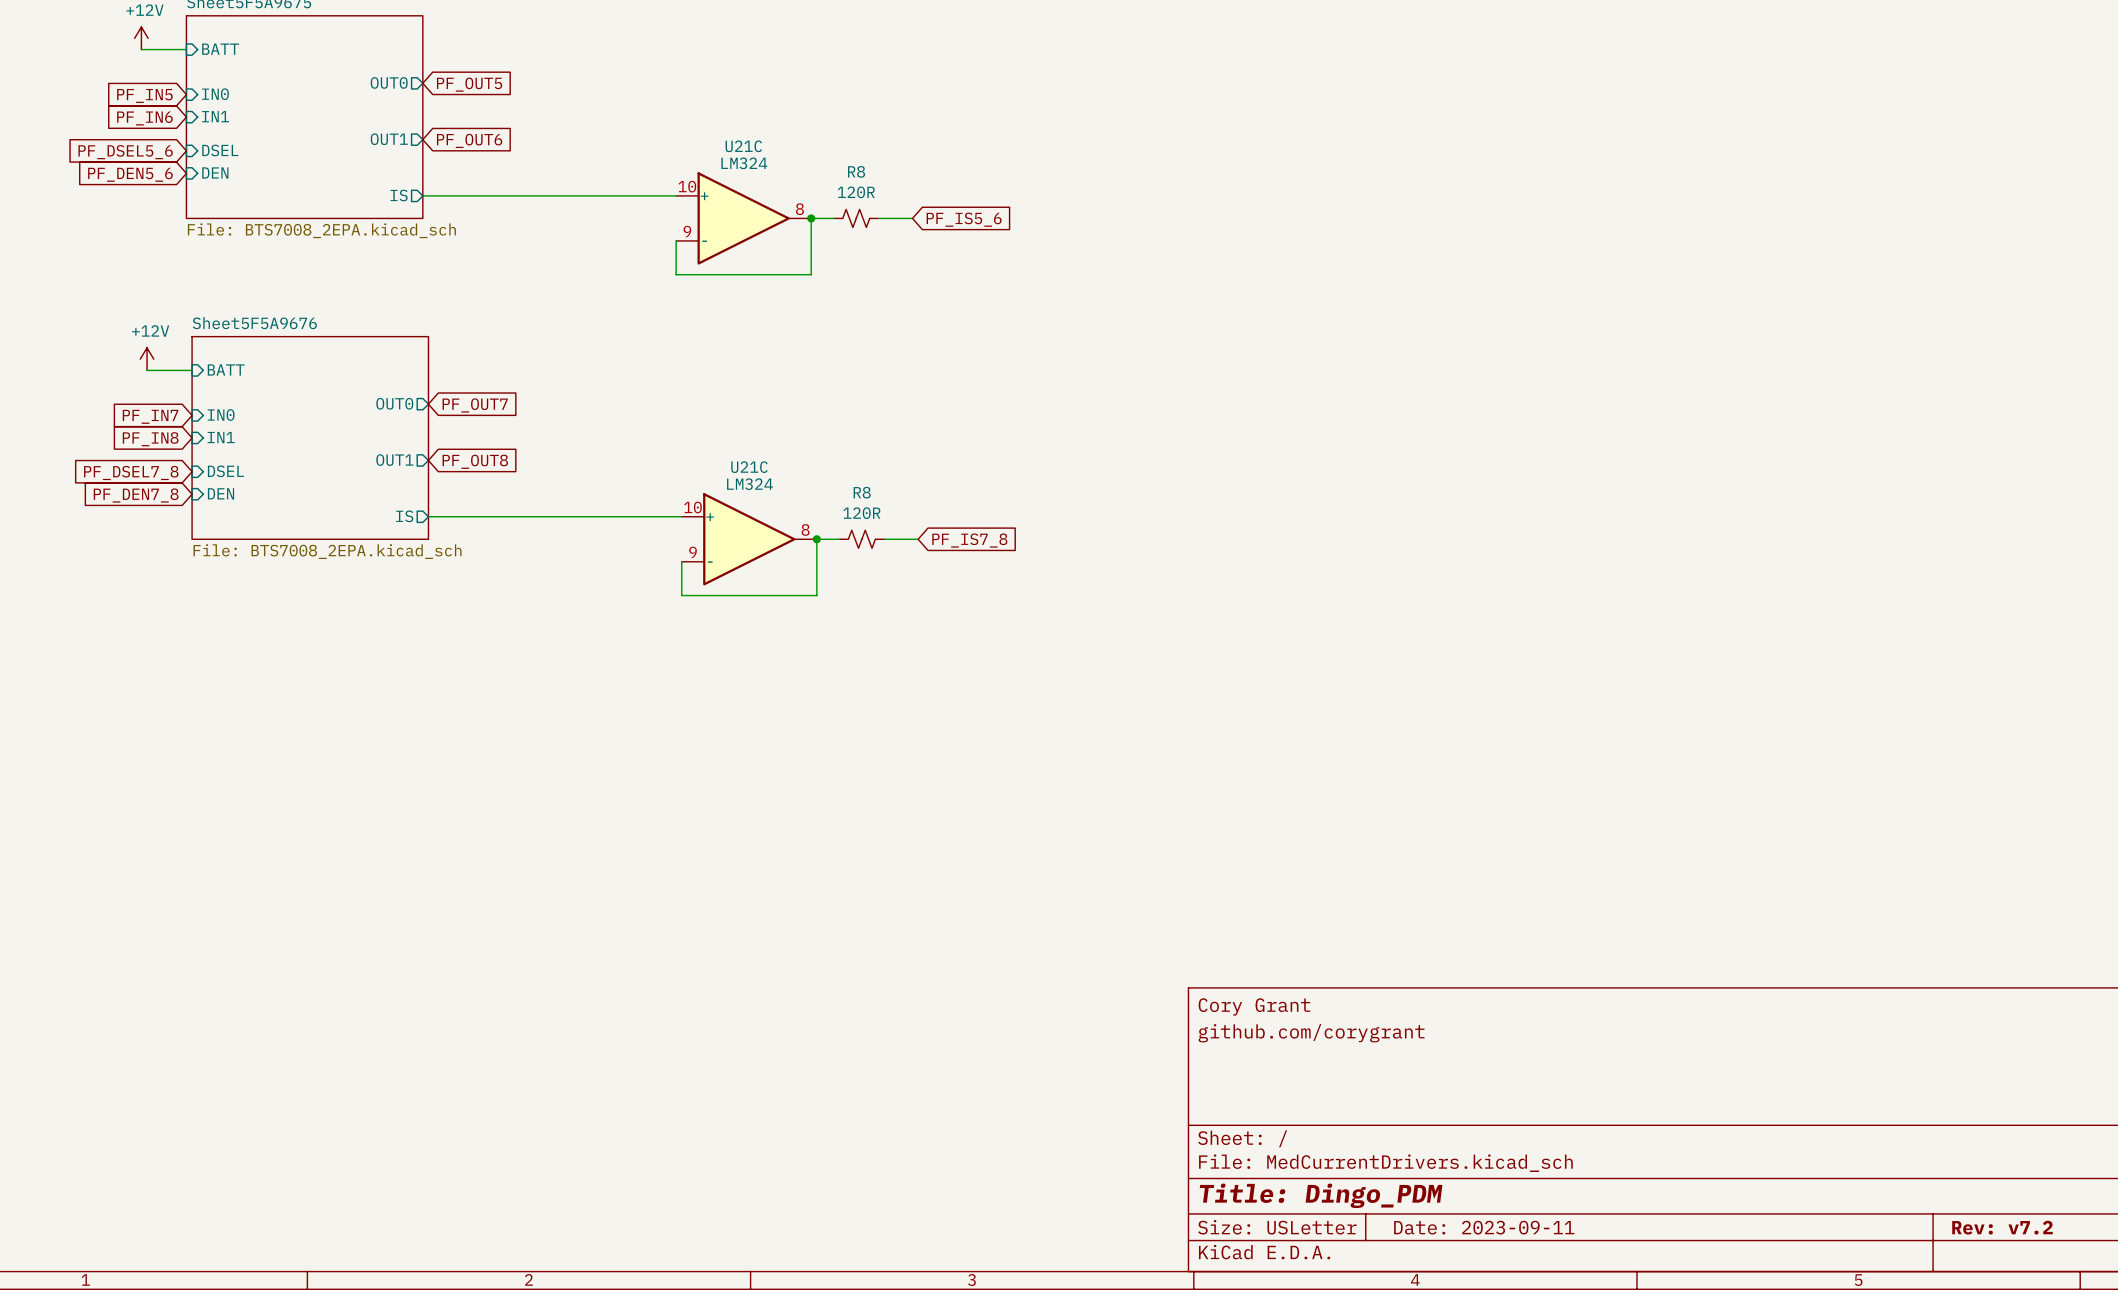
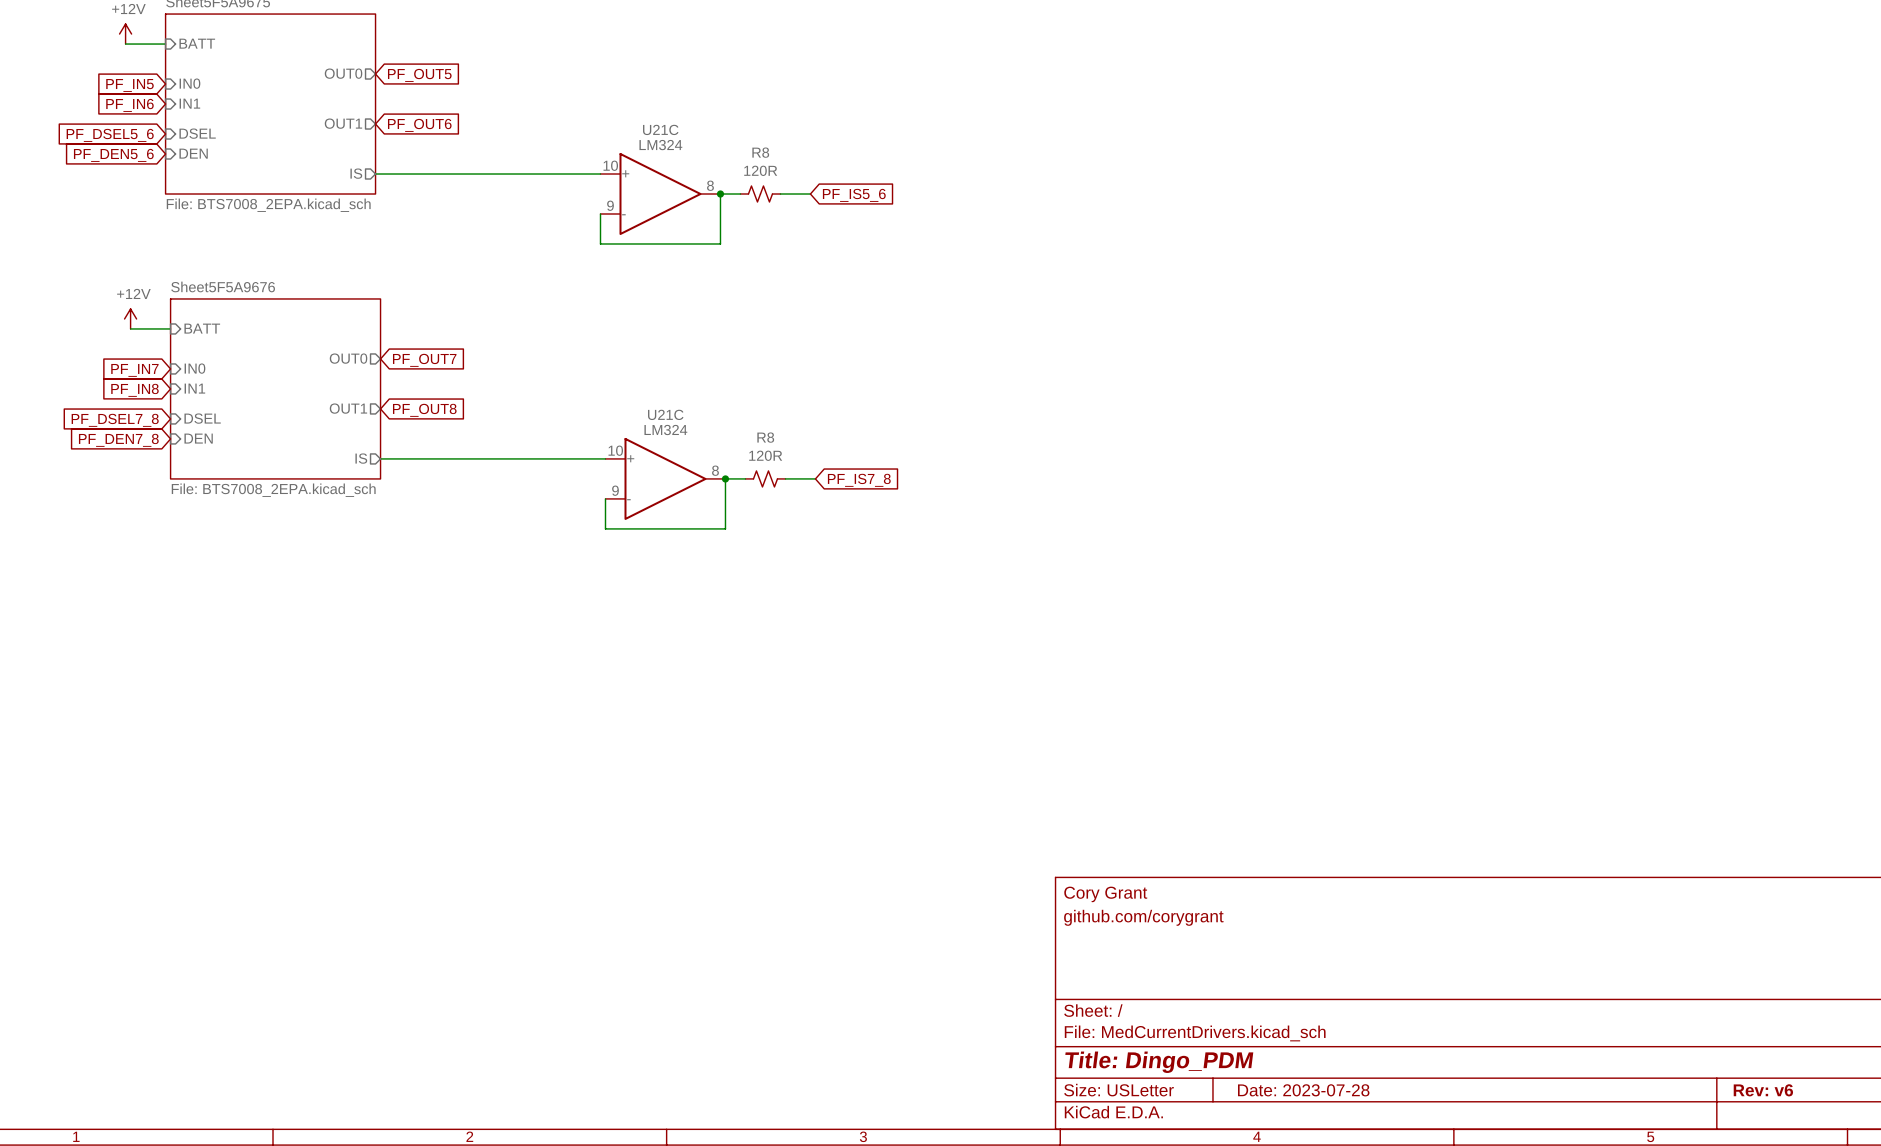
title block: Date: 2023-09-11 (1484, 1227) -> Date: 2023-07-28 (1303, 1090)
title block: Rev: v7.2 (2002, 1227) -> Rev: v6 (1763, 1090)

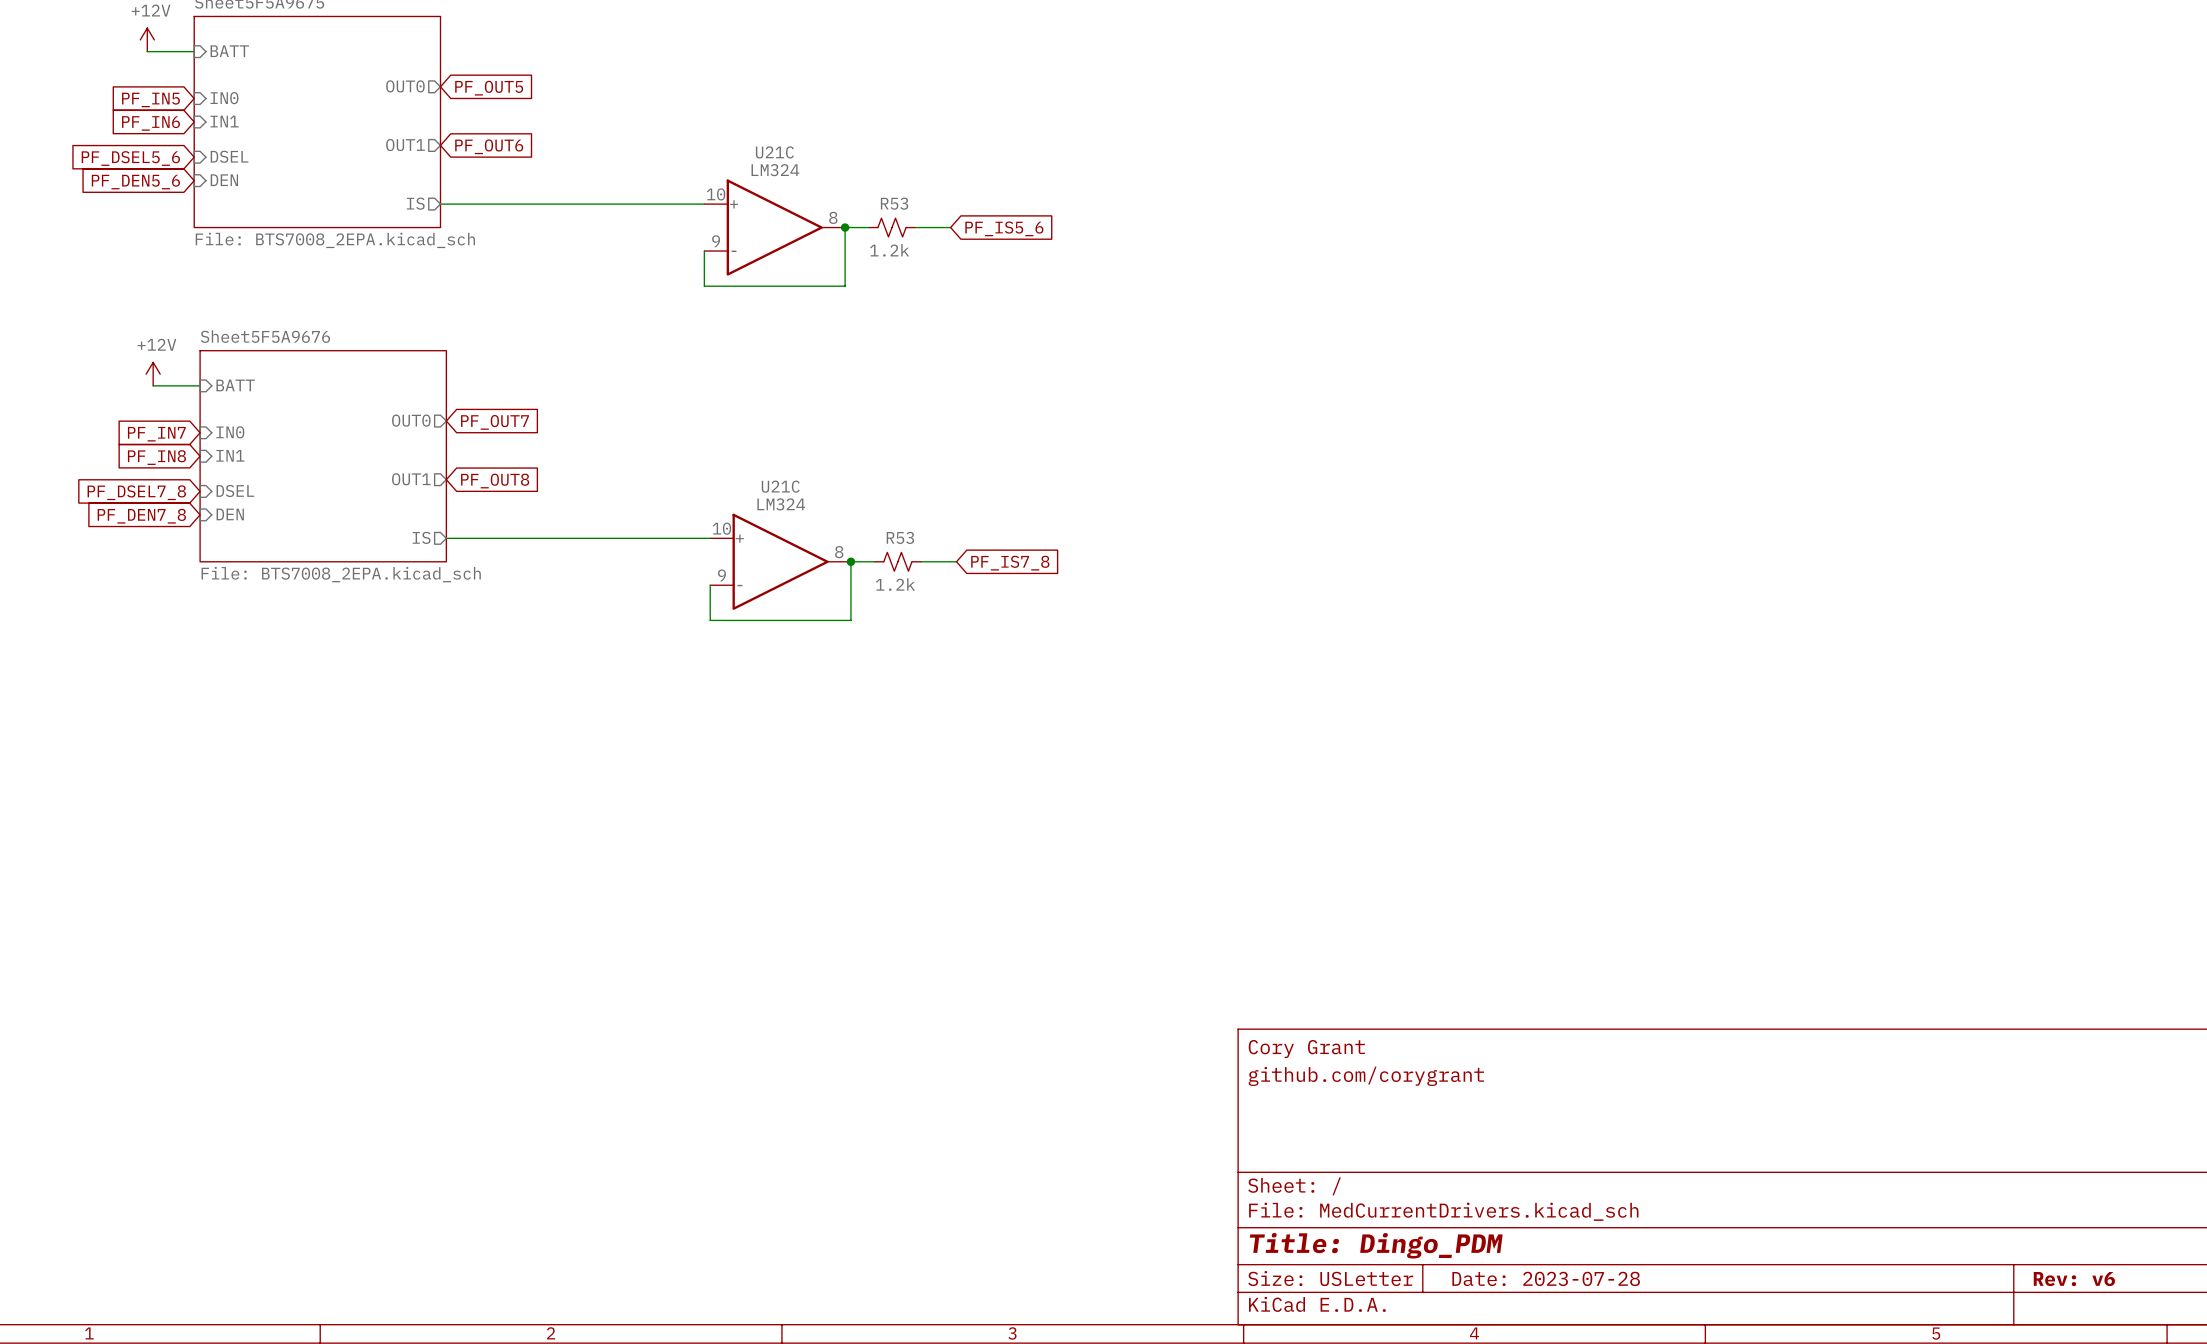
R8 name: R8 (760, 152) -> R53 (894, 203)
R8 value: 120R (760, 170) -> 1.2k (889, 250)
R8 name: R8 (765, 437) -> R53 (900, 537)
R8 value: 120R (765, 455) -> 1.2k (895, 584)

